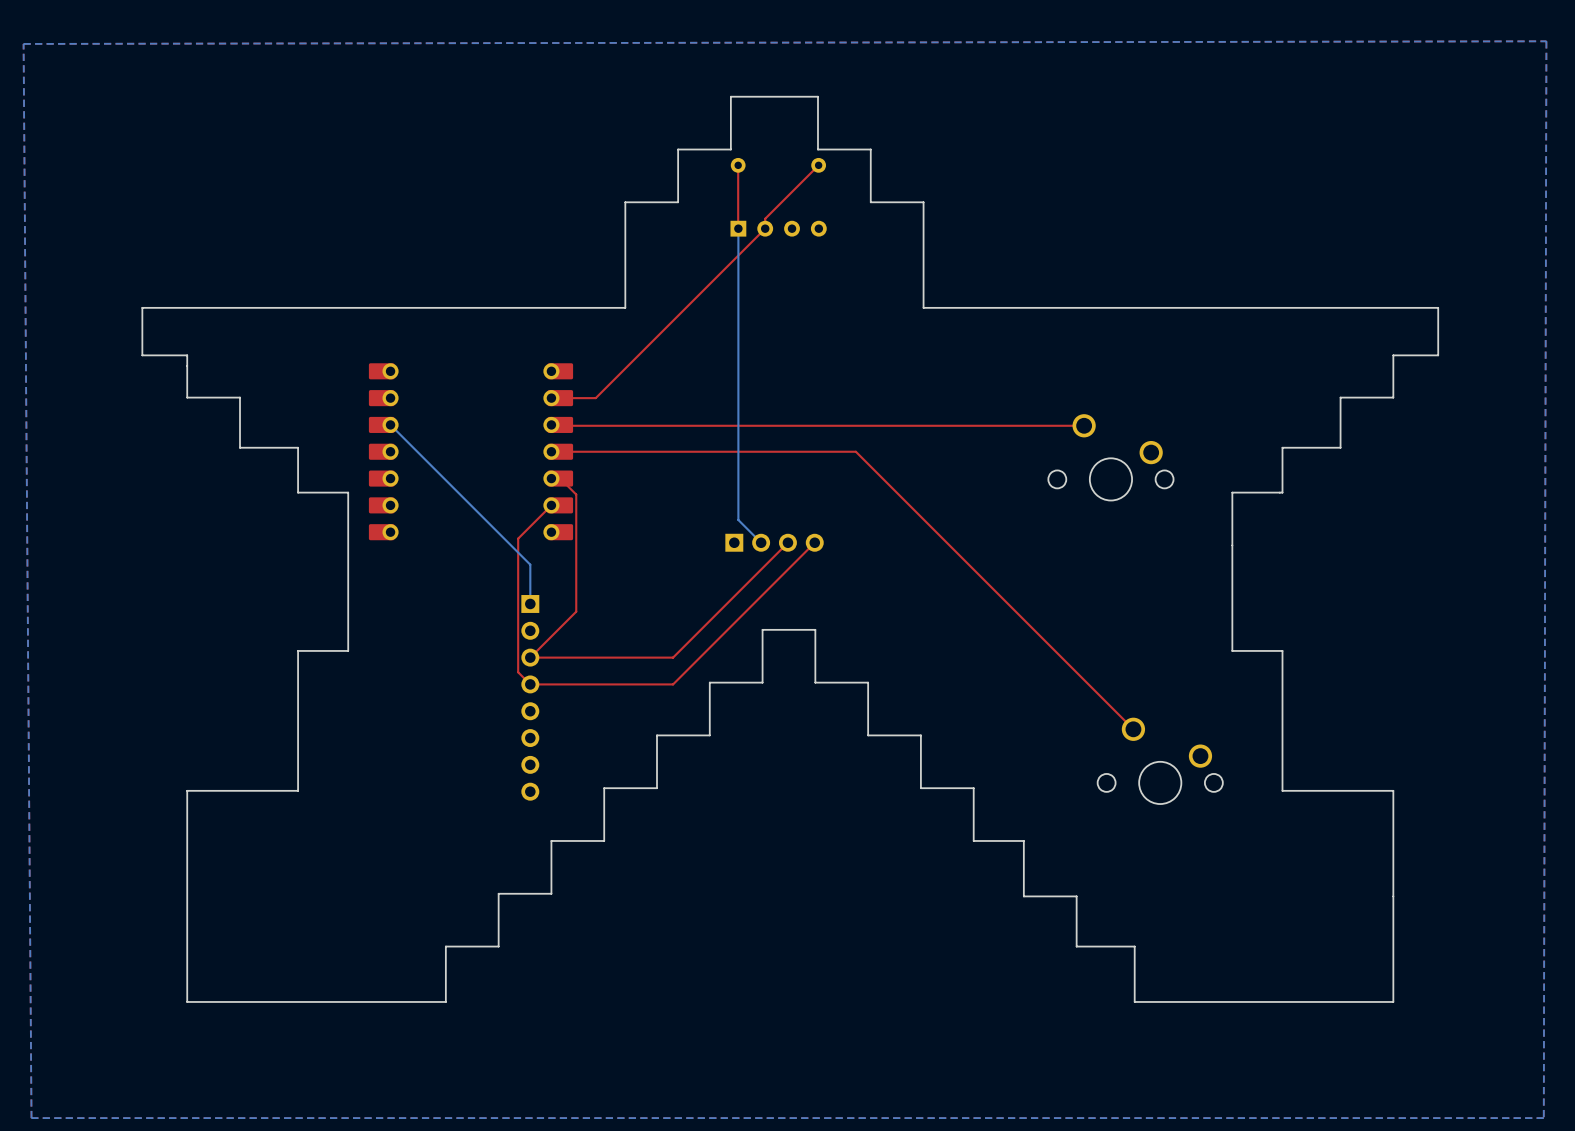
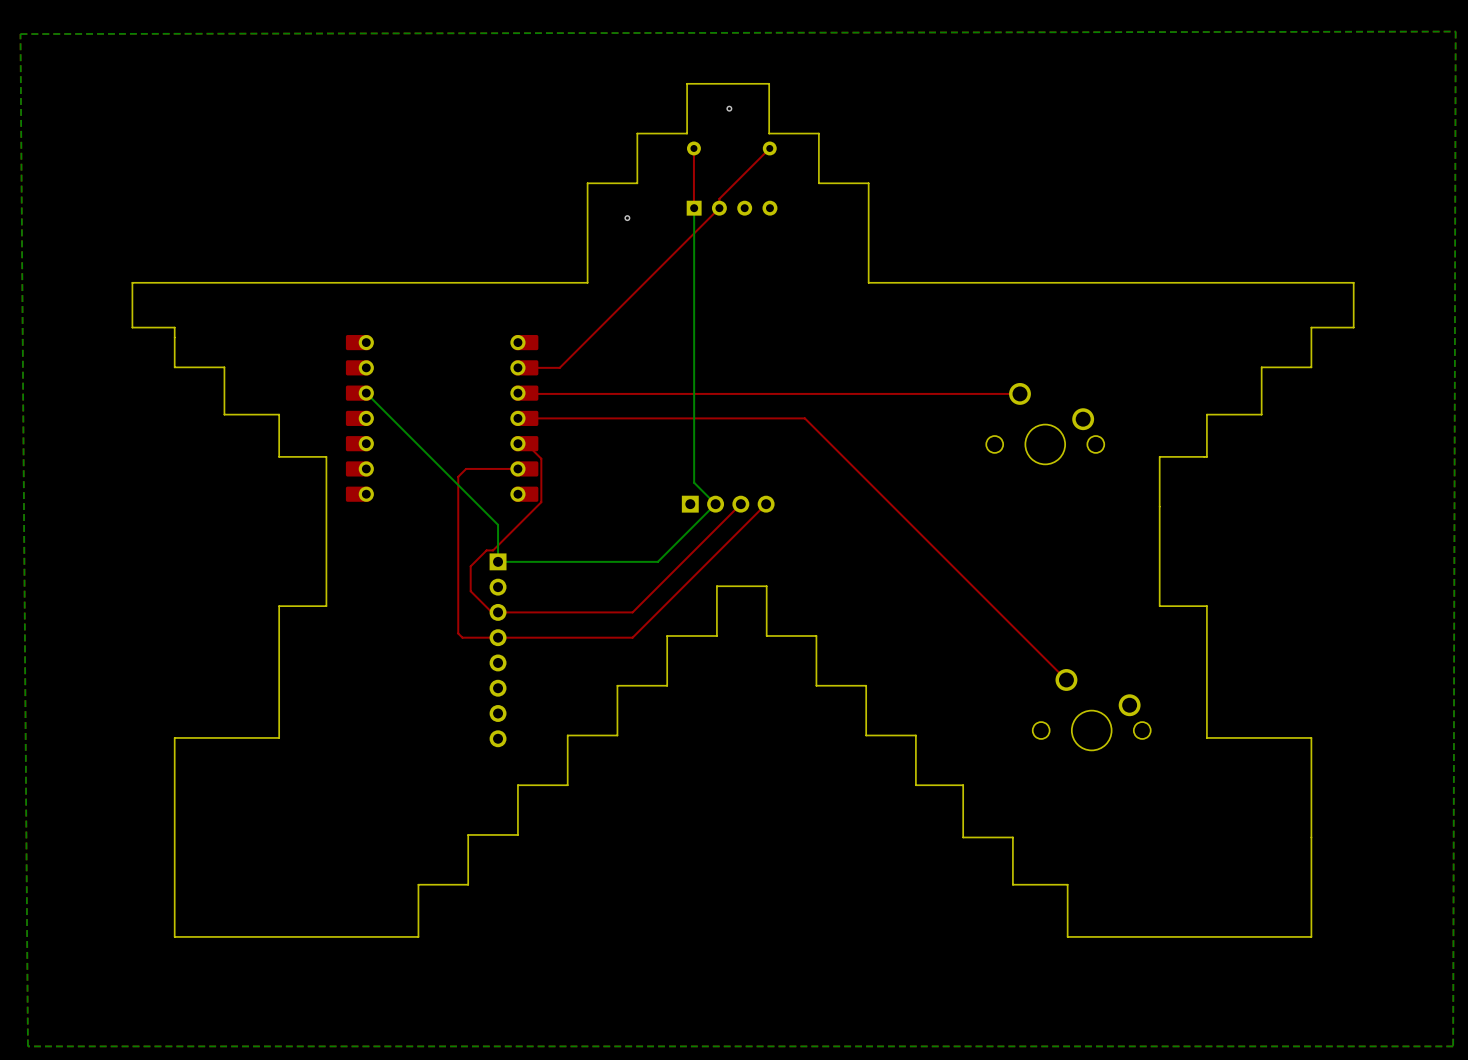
via: none -> (729, 108)
via: none -> (627, 218)
top track: (551, 505) (518, 538) (518, 672) (530, 684) -> (517, 468) (466, 468) (458, 476) (458, 633) (462, 637) (498, 637)
top track: (576, 540) (576, 611) (530, 657) -> (541, 502) (493, 550) (486, 550) (470, 566) (470, 591) (491, 612) (498, 612)
bottom track: none -> (715, 504) (657, 561) (498, 561)

